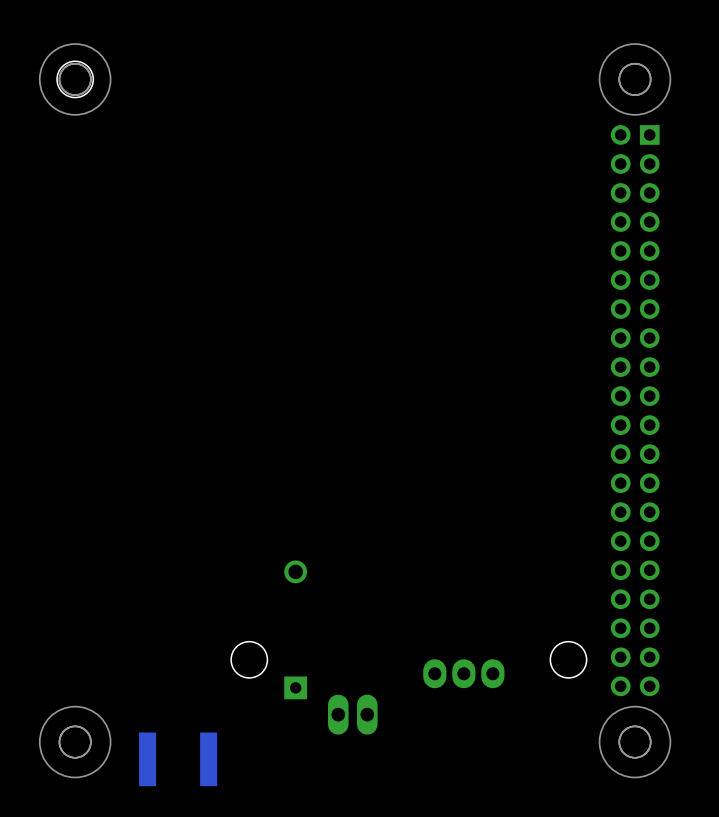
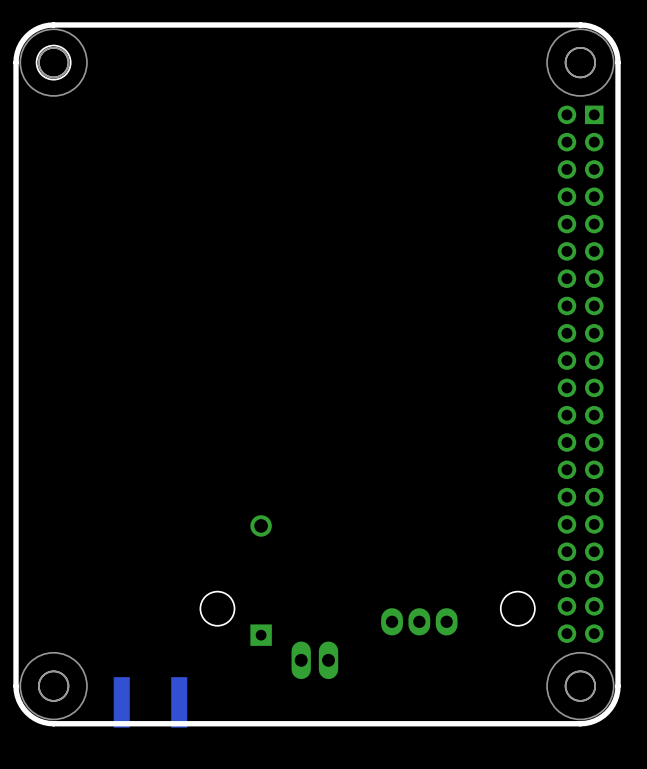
board edge: none -> (580, 24) (53, 24) (34, 30) (23, 39) (17, 52) (16, 62) (16, 686) (21, 704) (30, 715) (43, 722) (53, 723) (580, 723) (599, 718) (610, 709) (616, 695) (618, 686) (618, 62) (615, 48) (606, 36) (594, 27) (580, 24)

